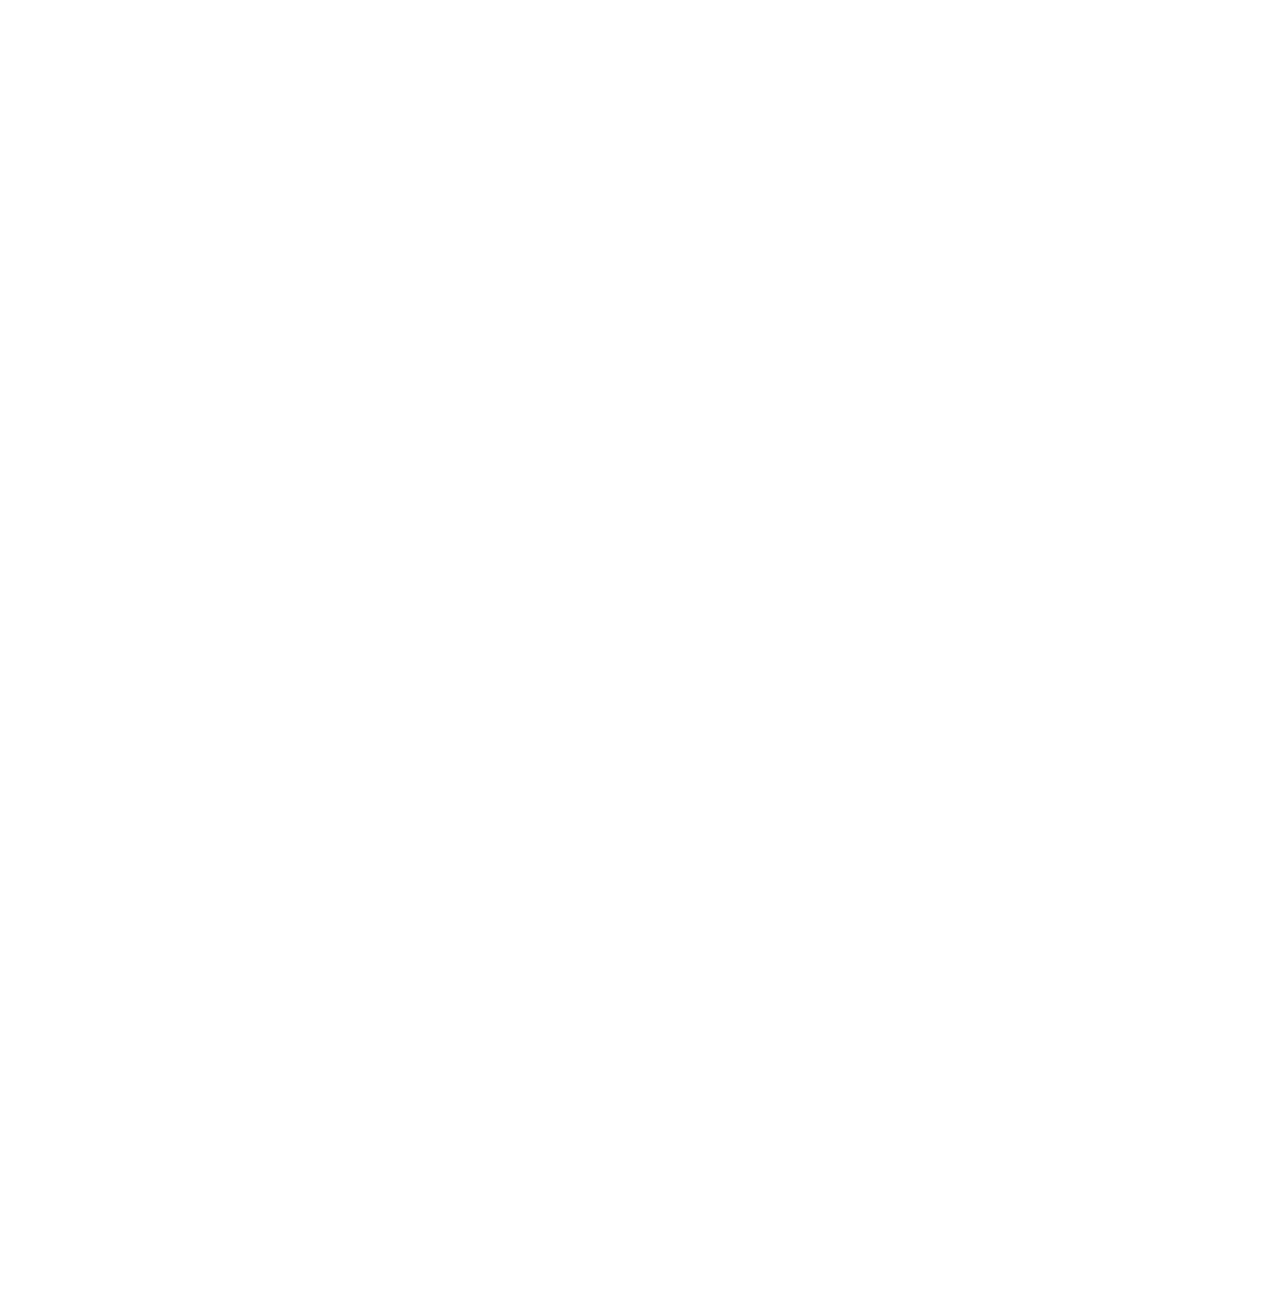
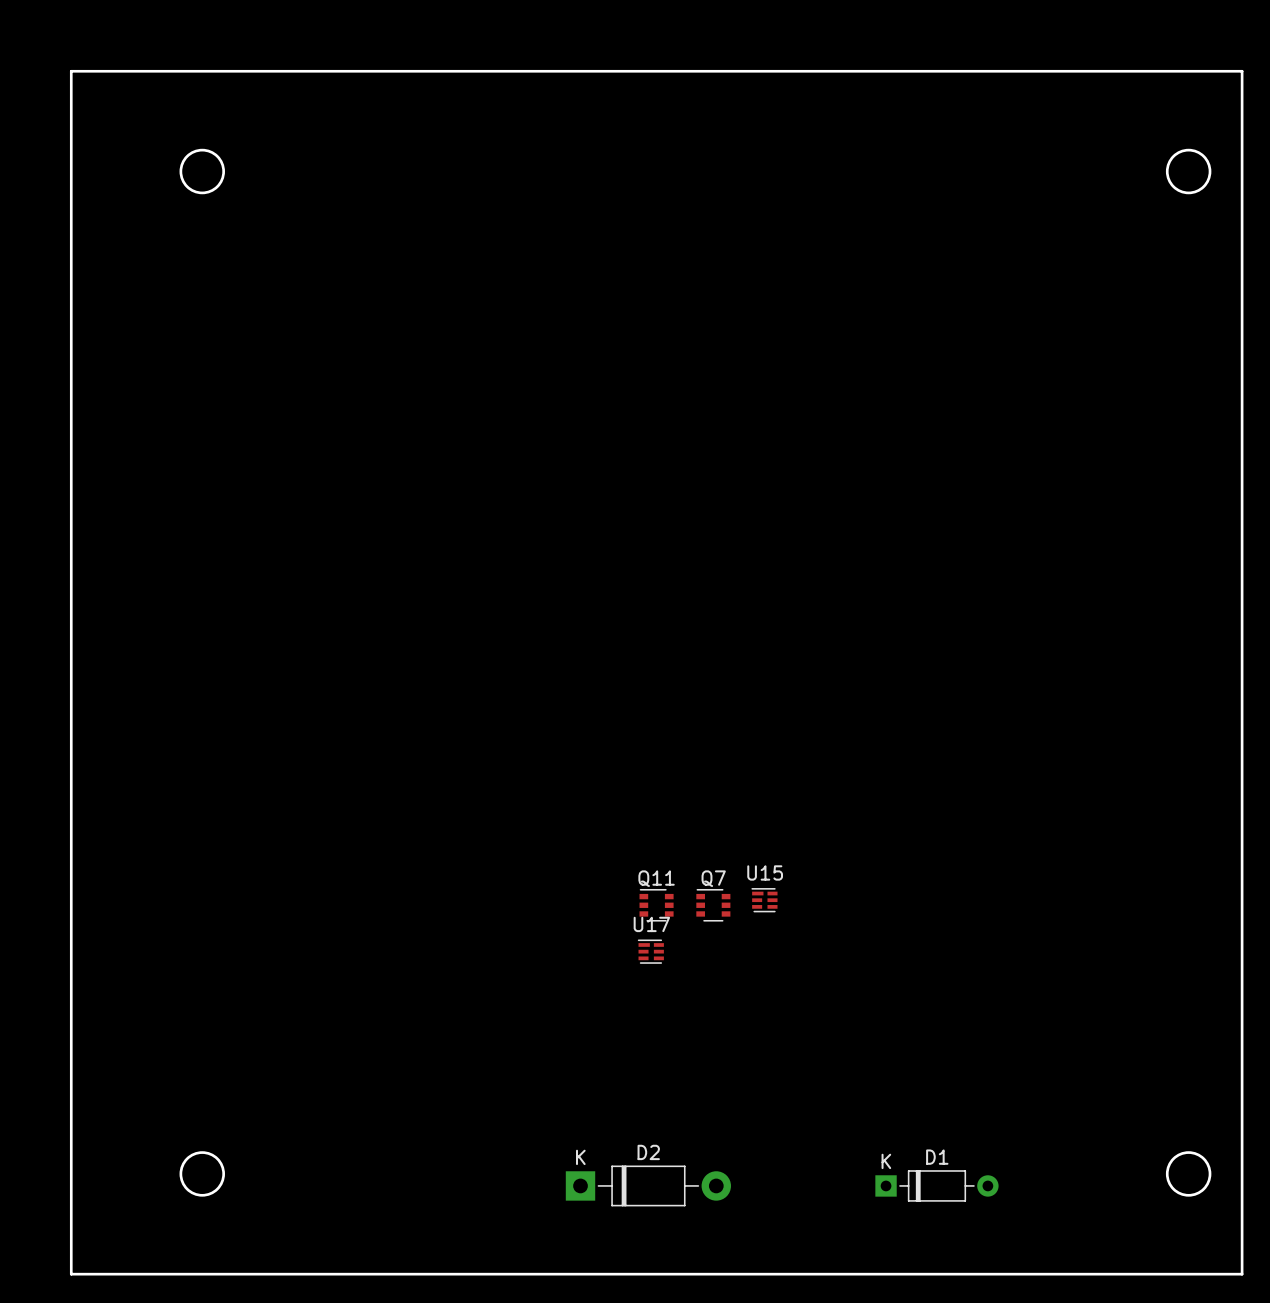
board edge: none -> (71, 71) (1242, 71) (1242, 1274) (71, 1274) (71, 71)
round board edge: none -> [179, 148, 225, 195]
round board edge: none -> [1165, 148, 1212, 195]
U15: none -> (764, 900)
Q11: none -> (656, 905)
Q7: none -> (713, 905)
U17: none -> (650, 951)
round board edge: none -> [179, 1151, 225, 1197]
round board edge: none -> [1165, 1151, 1212, 1197]
D2: none -> (648, 1185)
D1: none -> (936, 1185)

